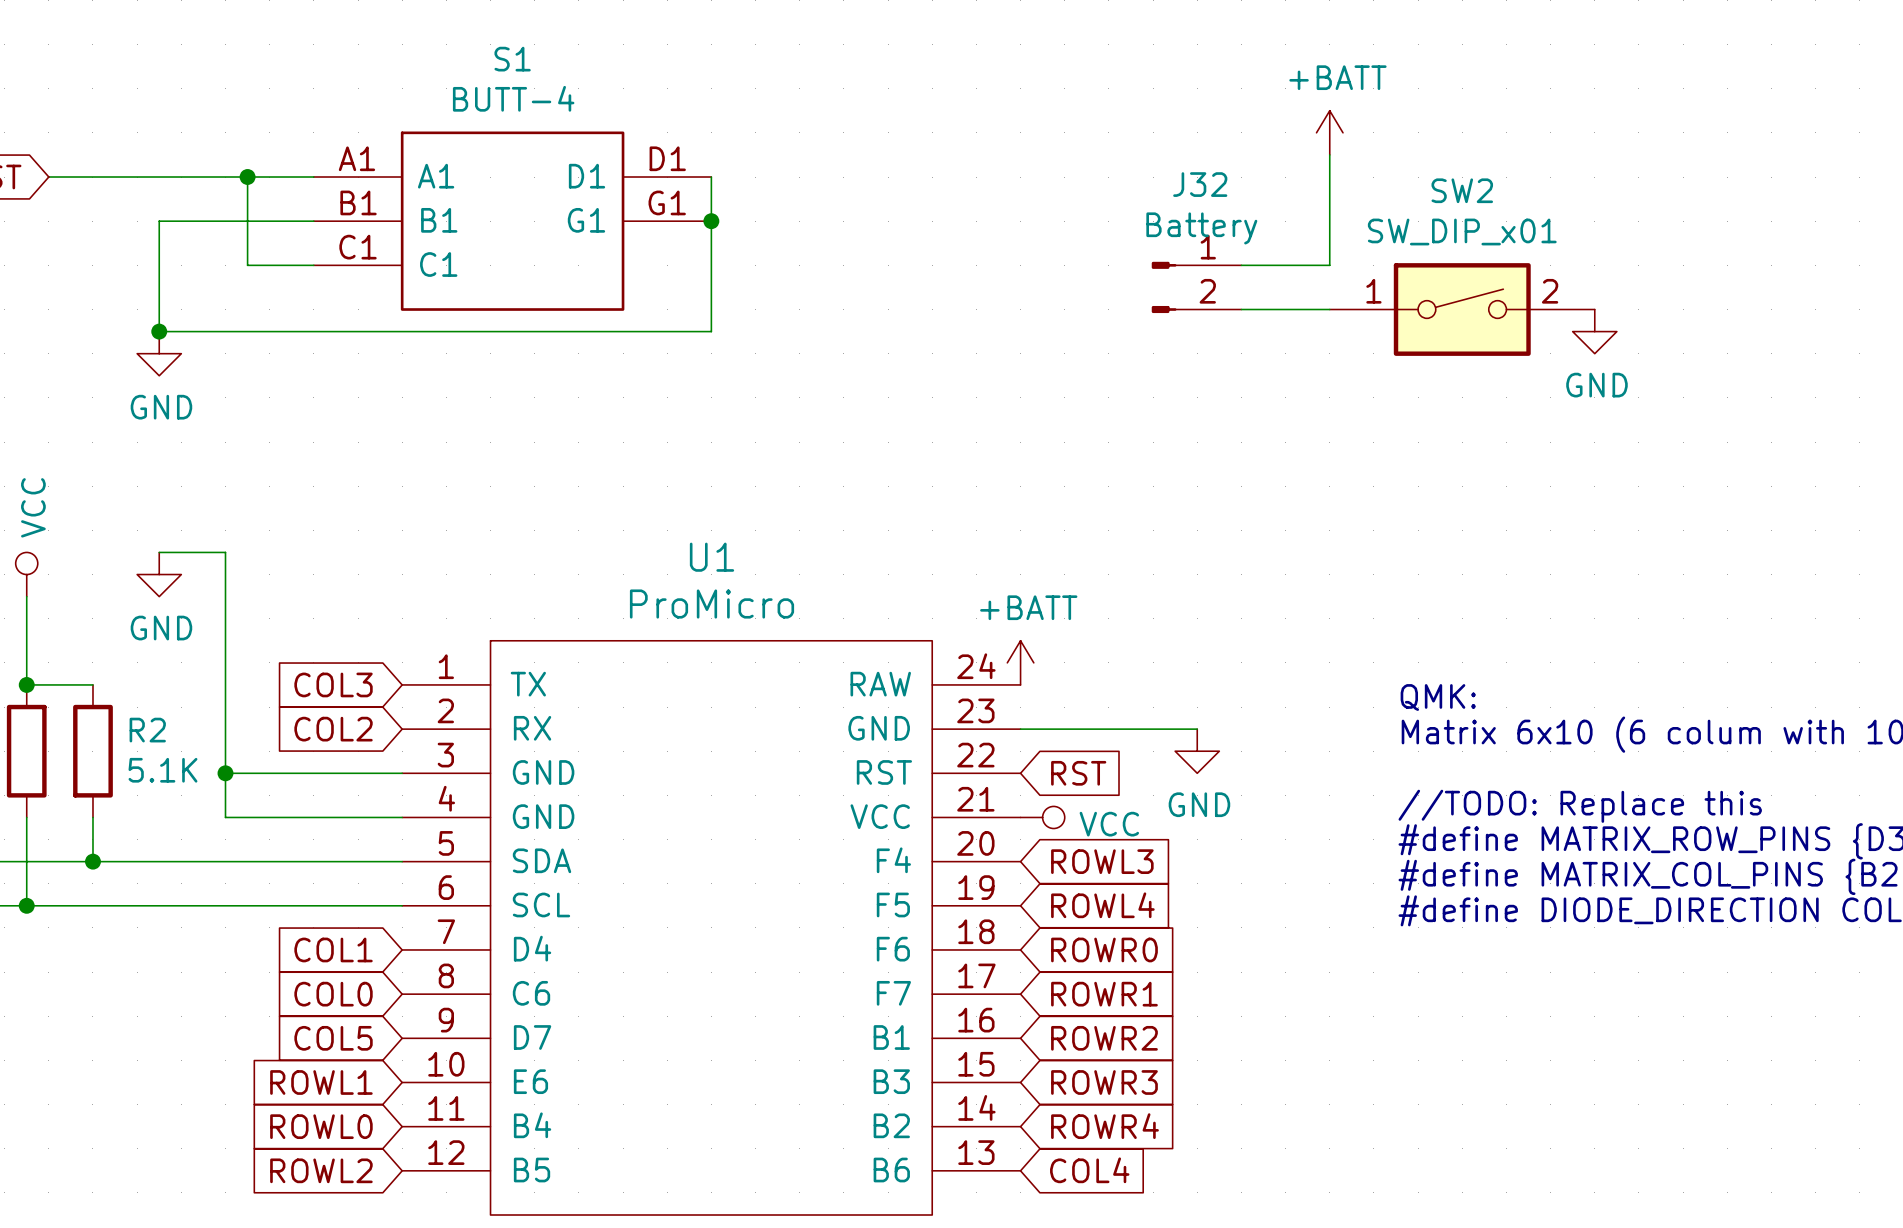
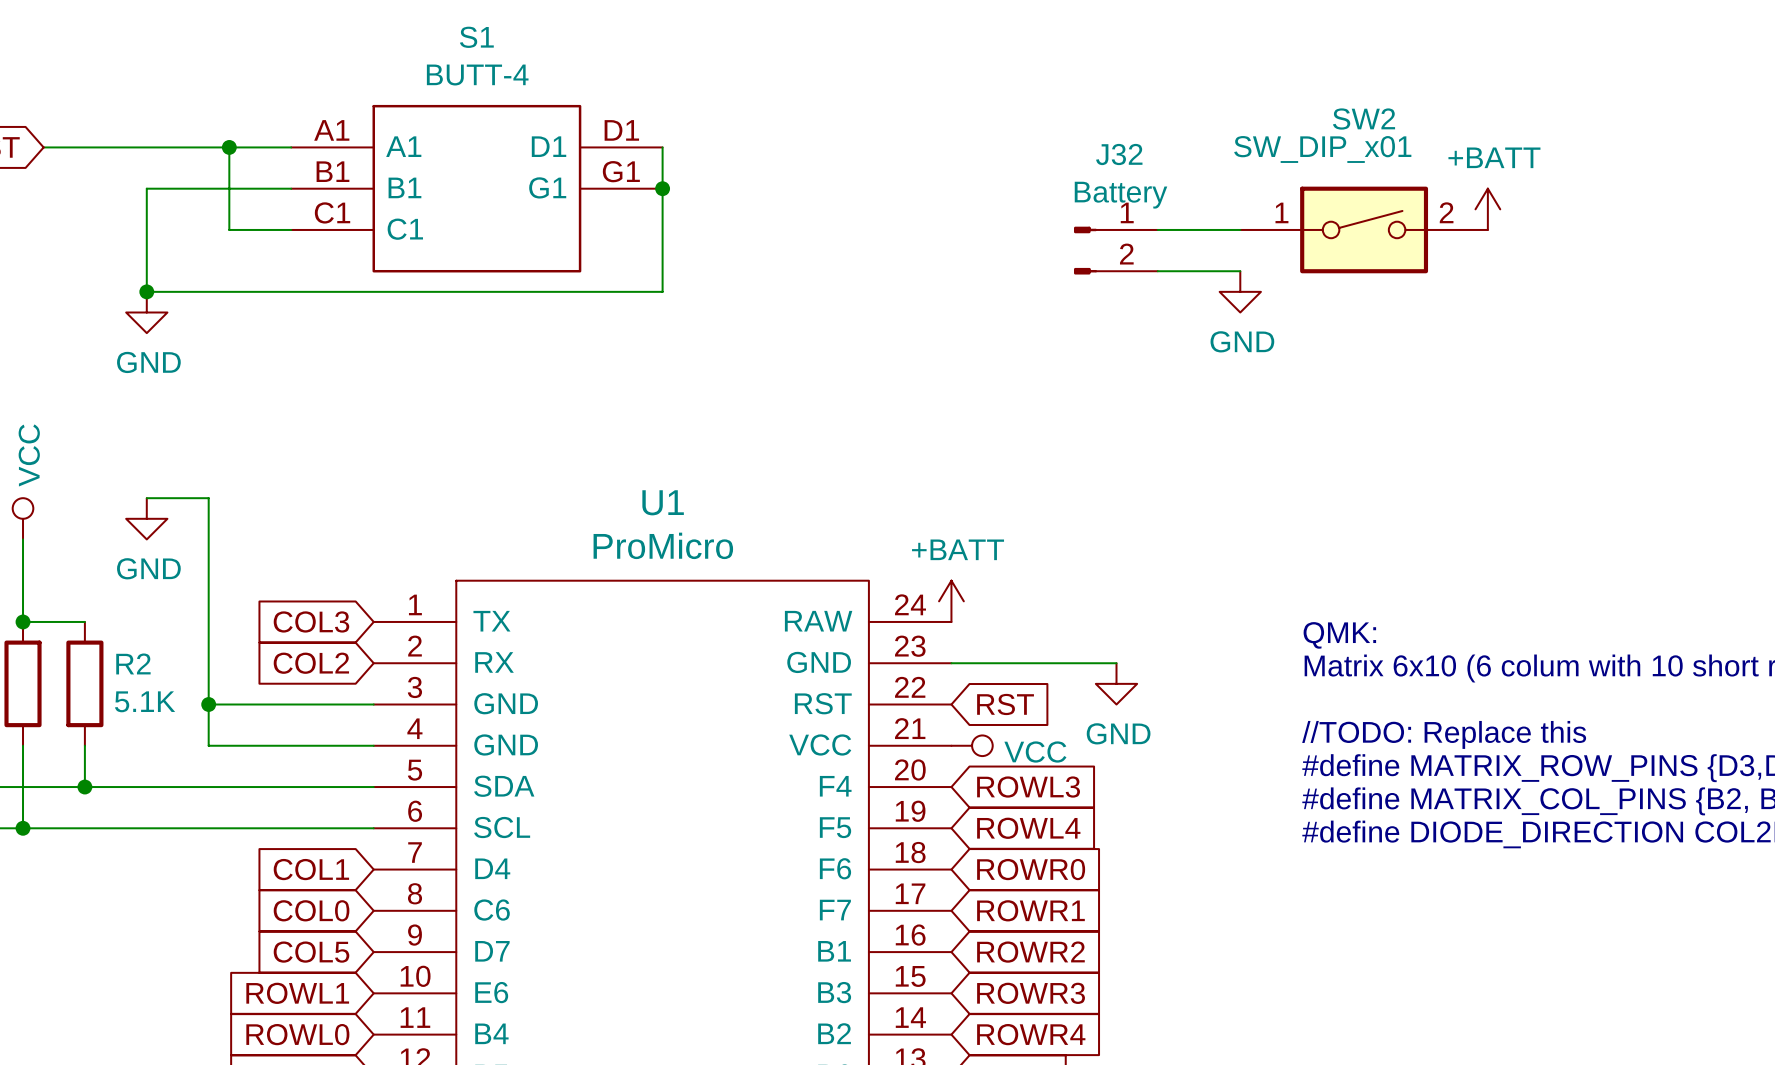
power symbol position: +BATT (1329, 132) -> +BATT (1487, 209)
wire: (1329, 154) (1329, 265) -> none
SW2 value position: SW_DIP_x01 (1462, 232) -> SW_DIP_x01 (1322, 149)
SW2 position: (1462, 309) -> (1364, 229)
power symbol position: GND (1594, 331) -> GND (1240, 291)

